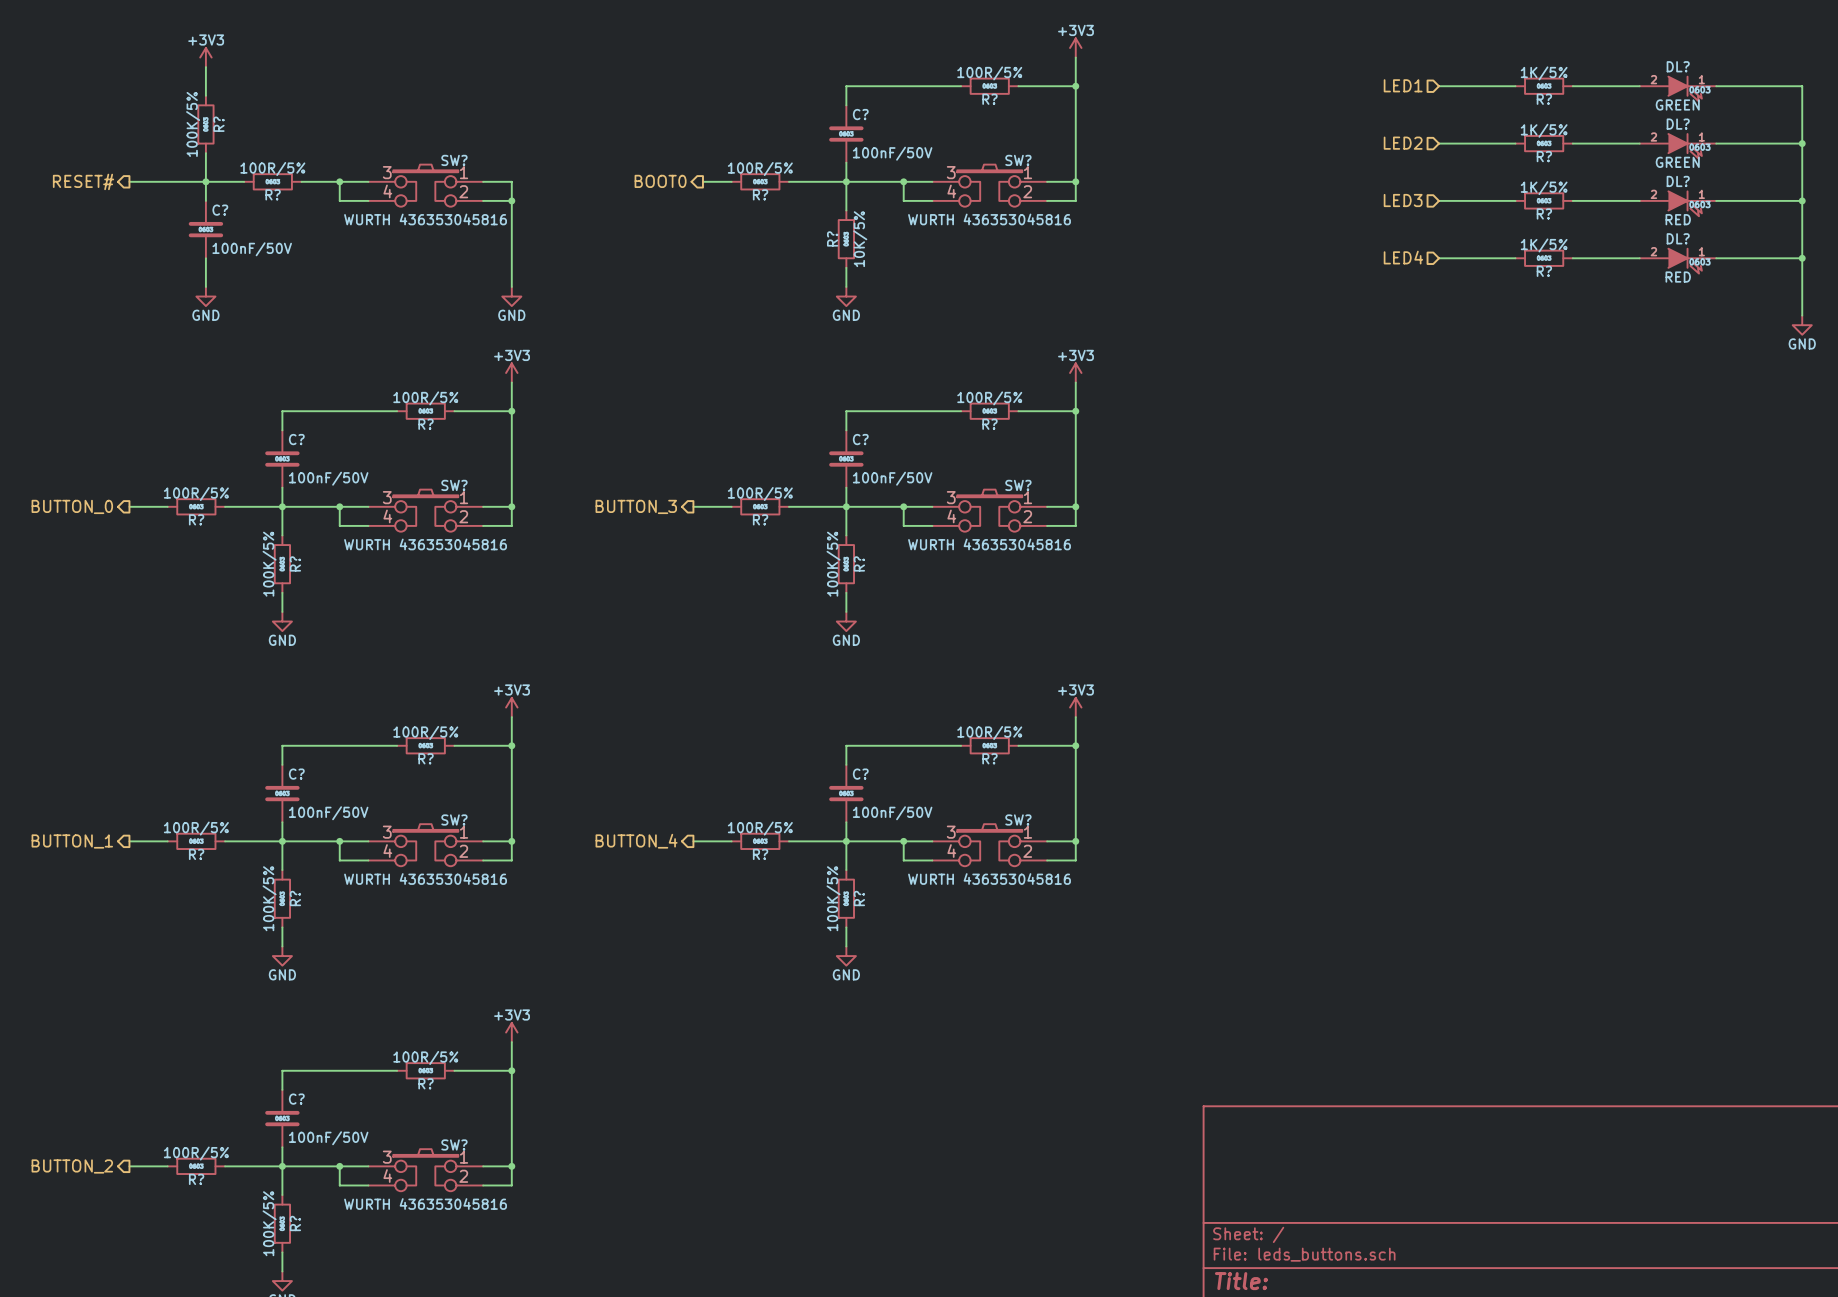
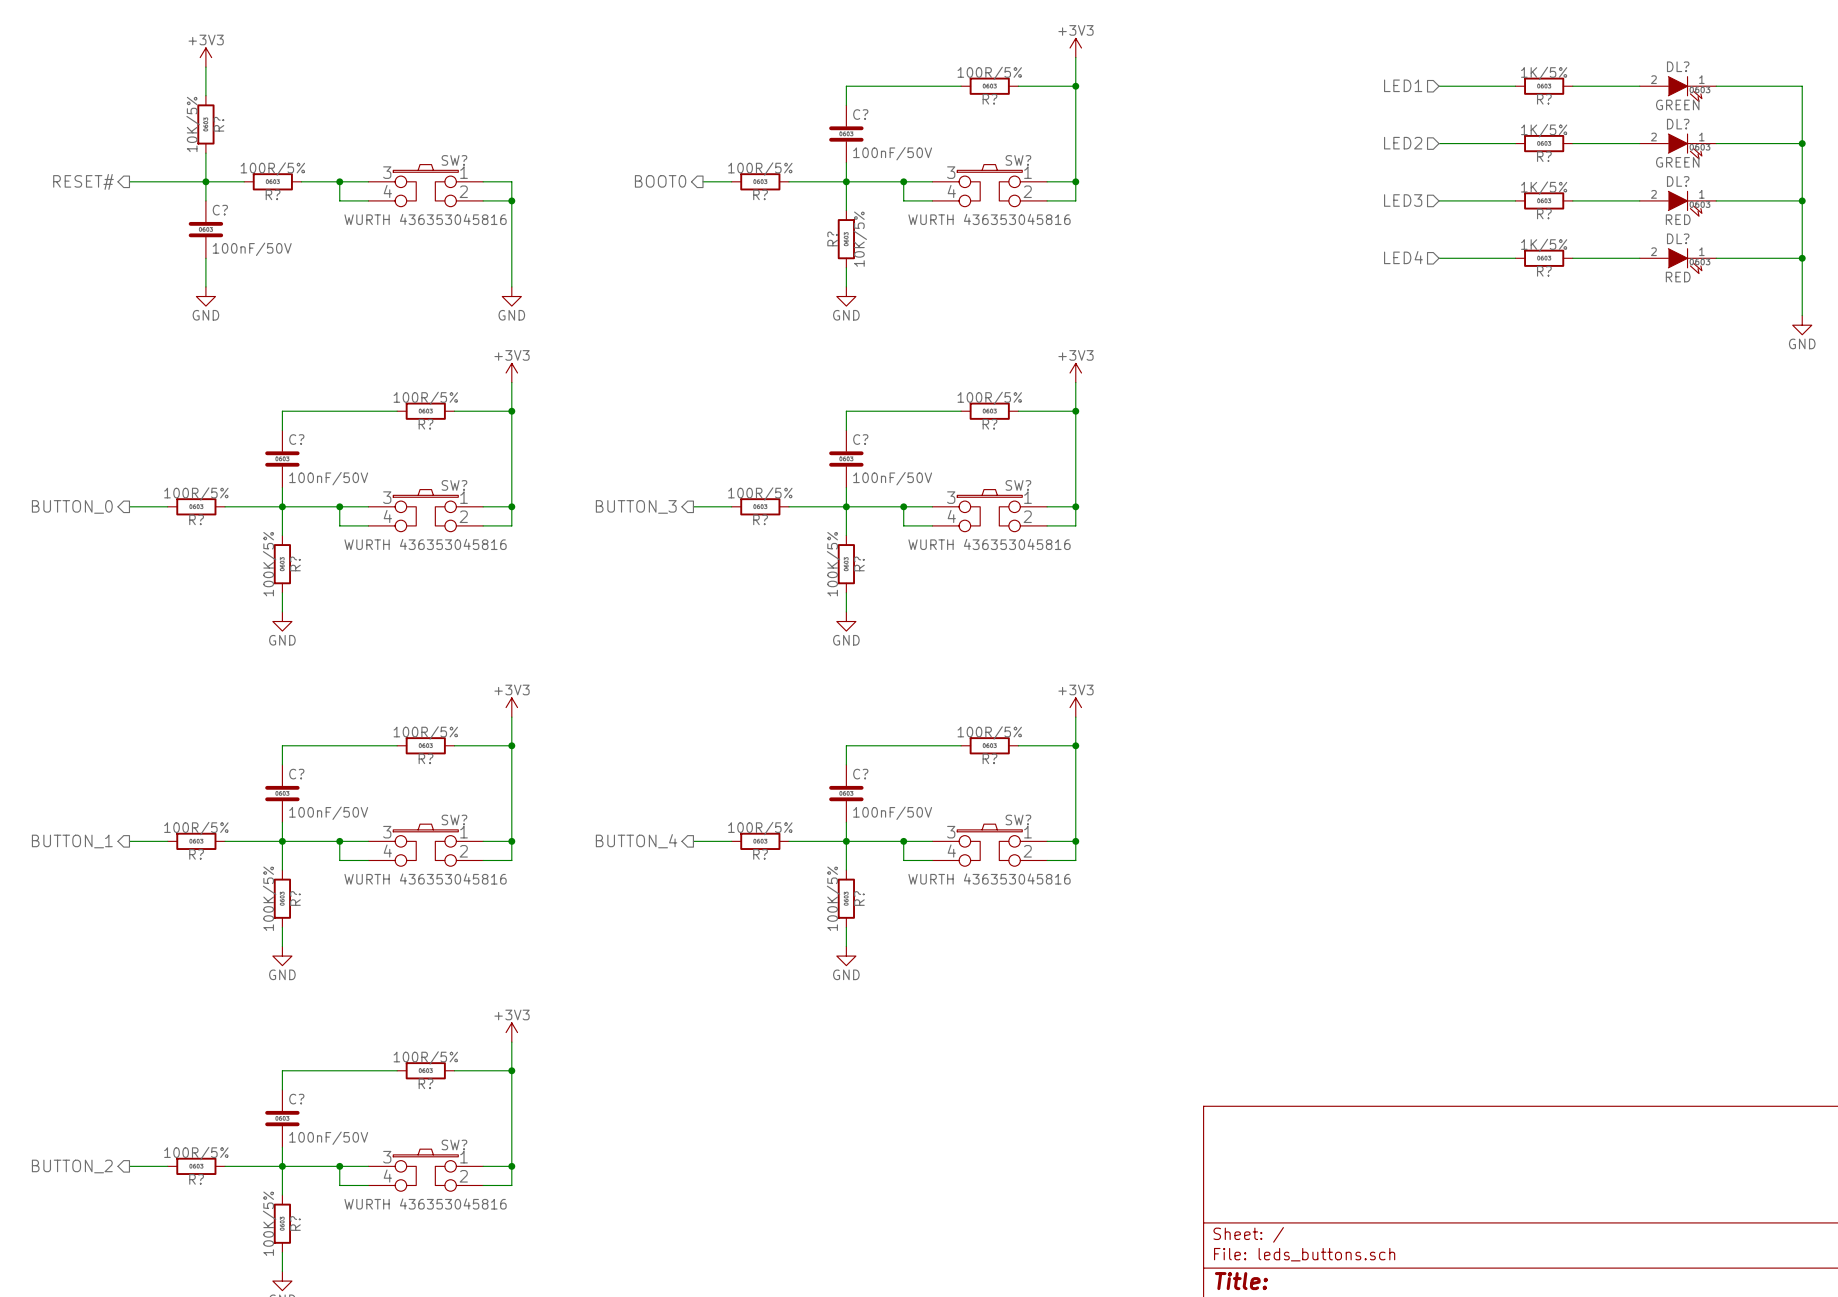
R? value: 100K/5% (193, 124) -> 10K/5% (193, 124)

